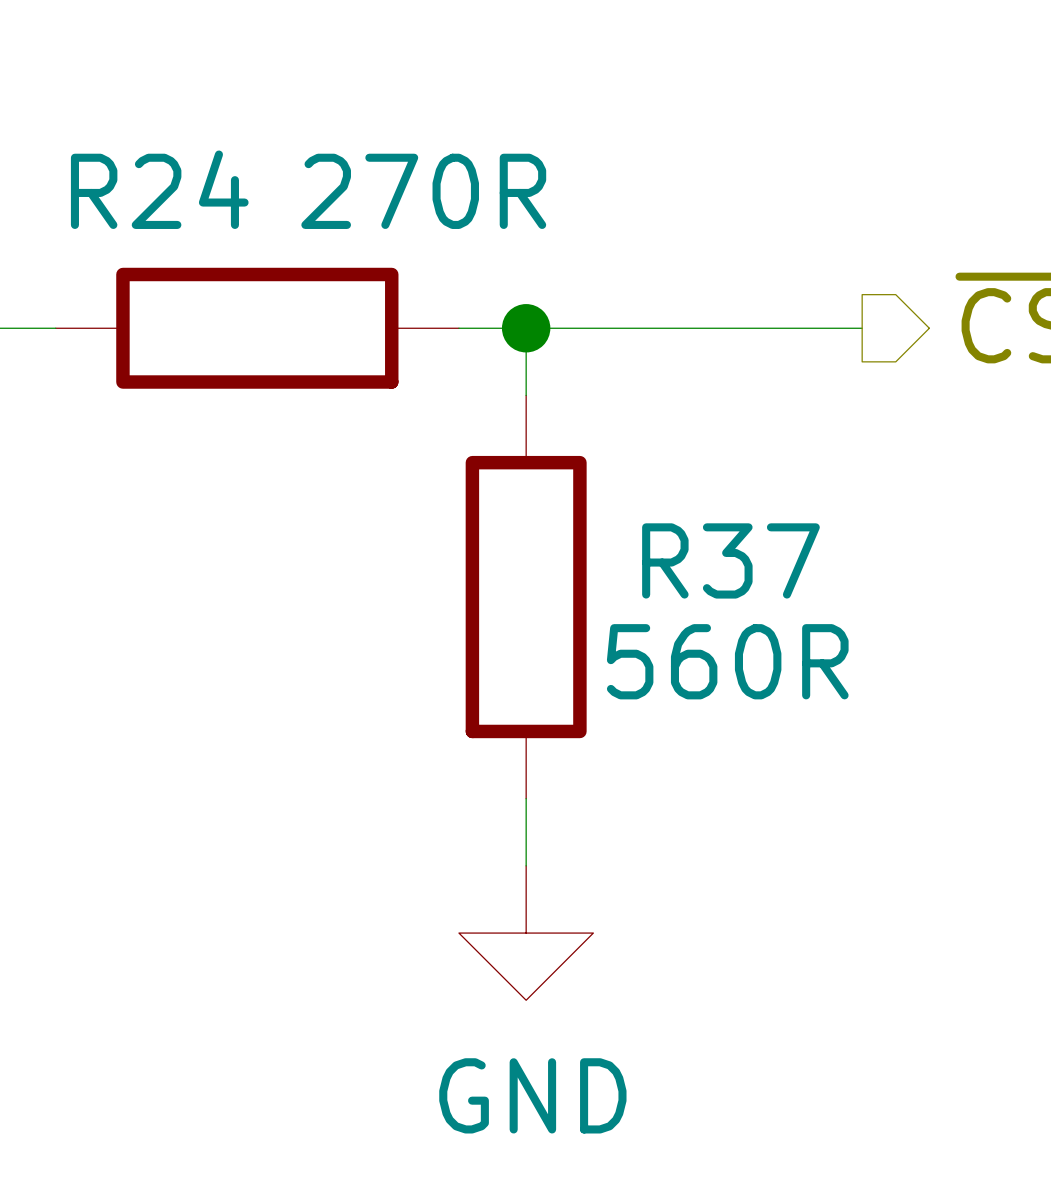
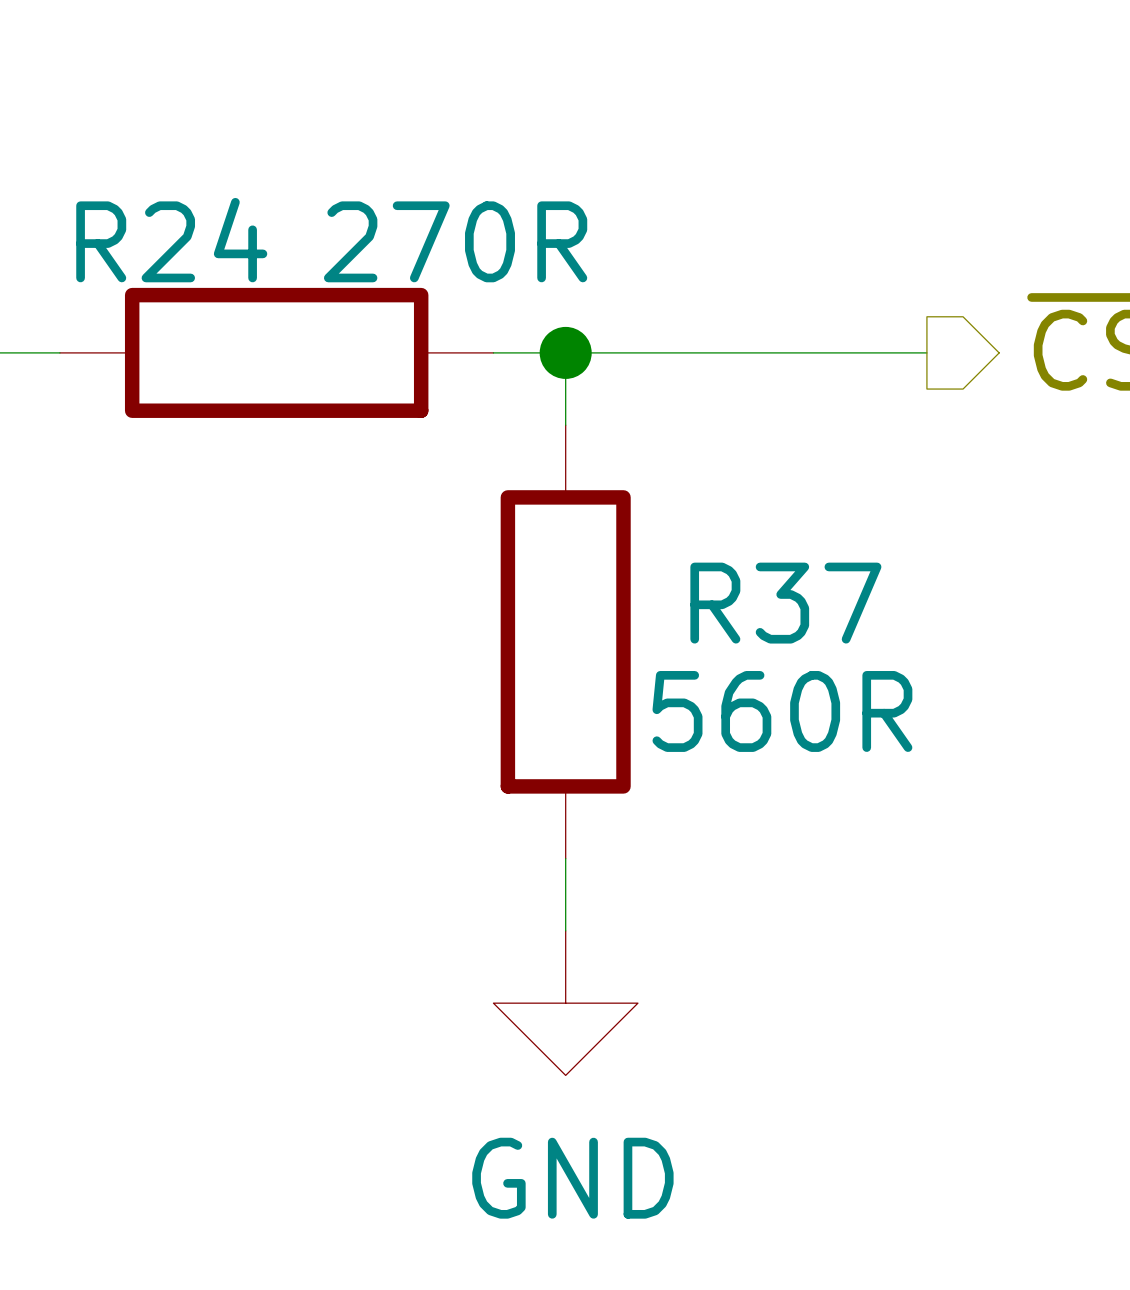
R24 name position: R24 (159, 189) -> R24 (171, 240)
R24 value position: 270R (423, 191) -> 270R (455, 241)

